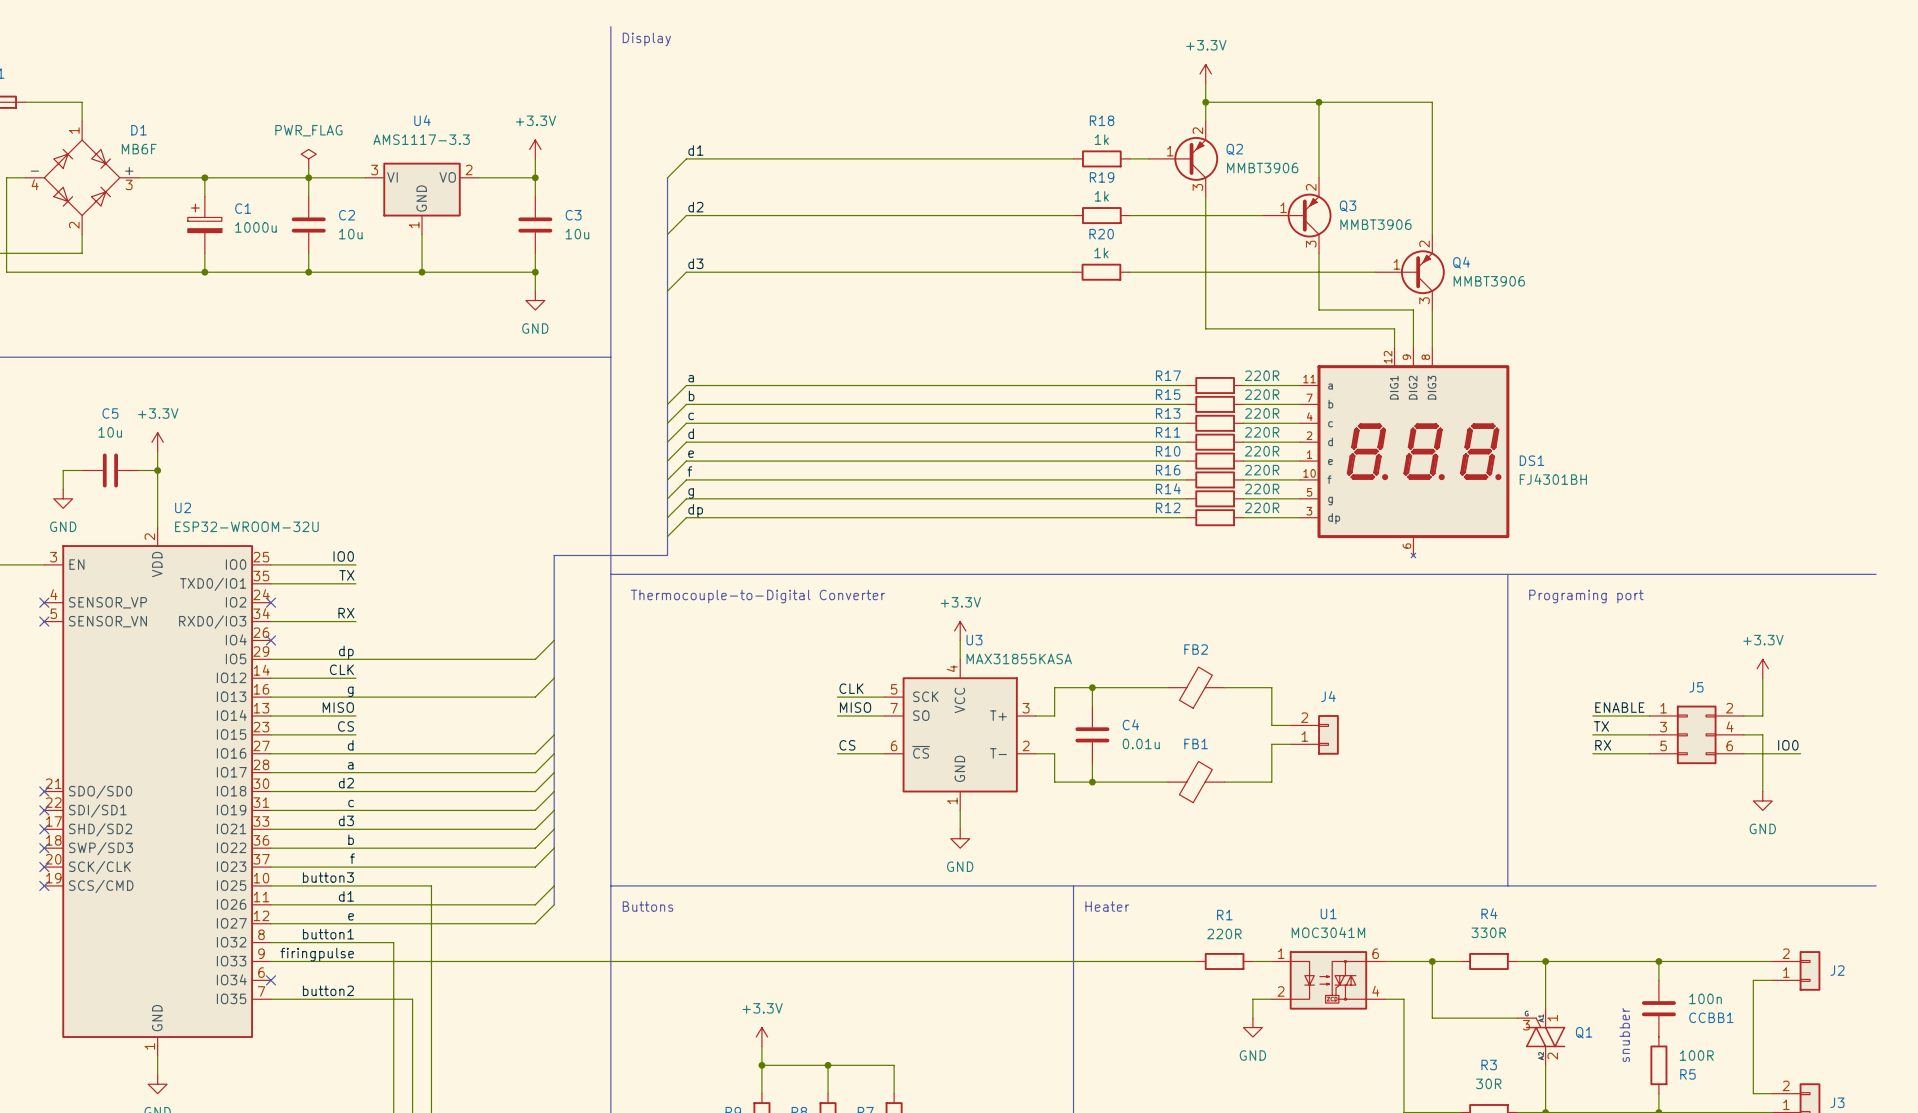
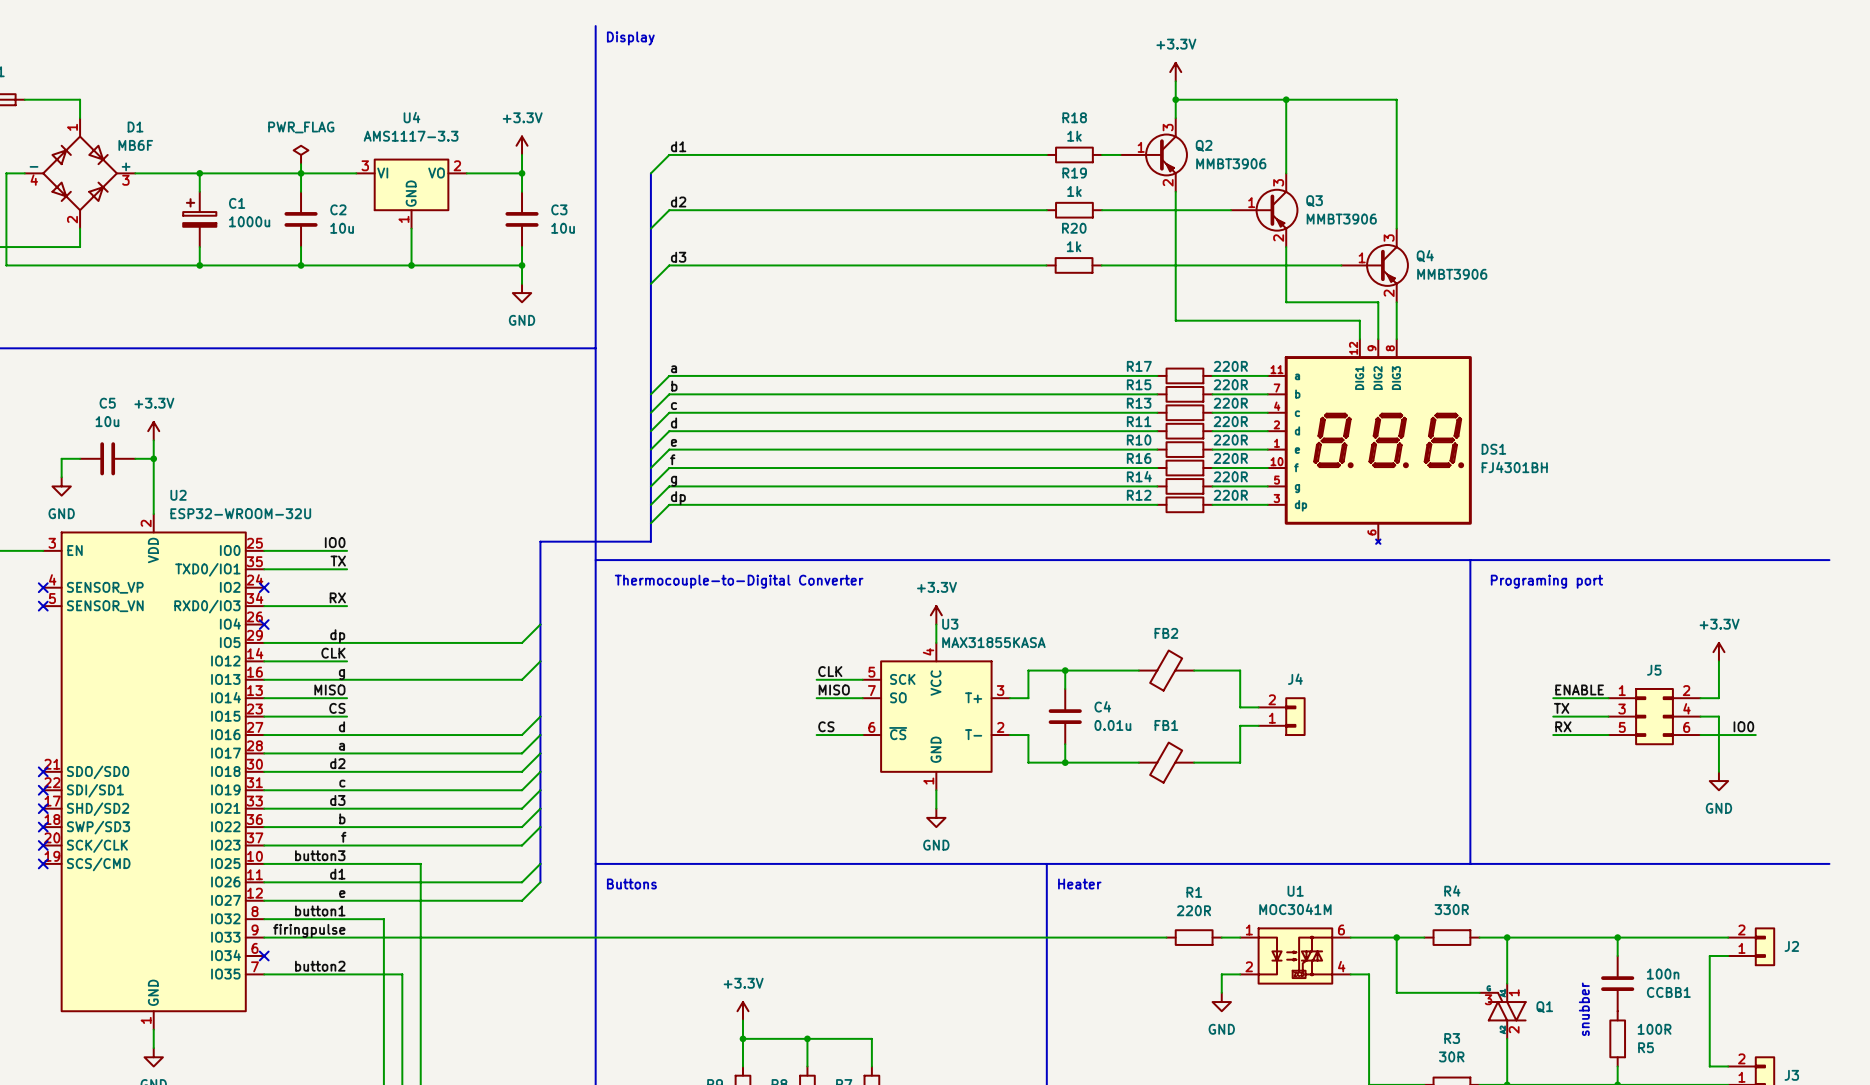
Q2 flip: as is (1196, 158) -> up-down (1166, 154)
Q3 flip: as is (1309, 215) -> up-down (1277, 210)
Q4 flip: as is (1422, 272) -> up-down (1387, 265)

